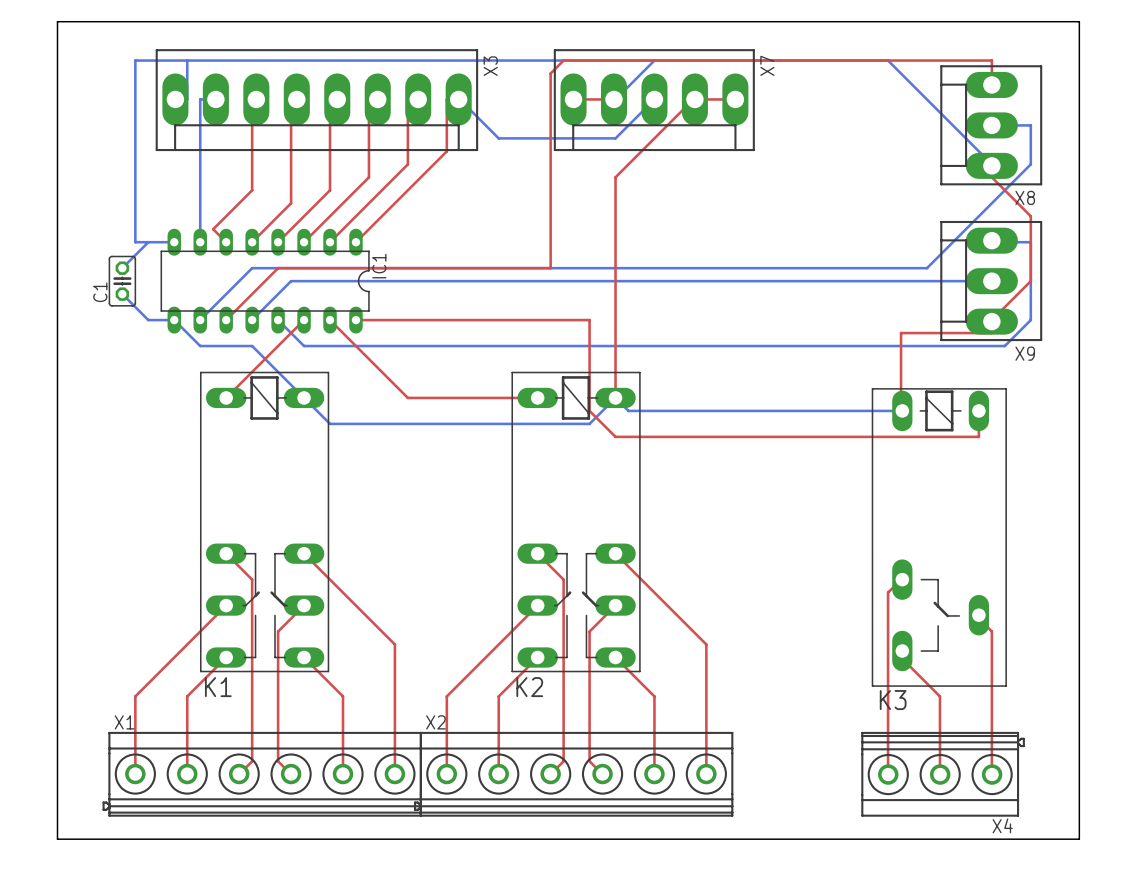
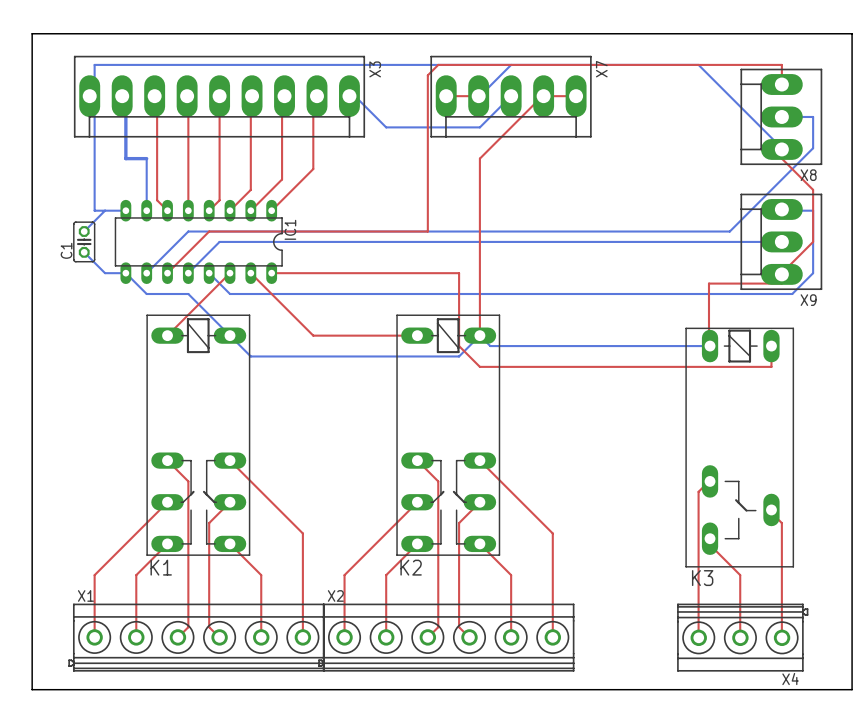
X3 footprint: [155, 49, 479, 152] -> [73, 55, 366, 138]
bottom track: (187, 60) (187, 99) (175, 99) -> none
top track: none -> (154, 96) (157, 96) (157, 200)
bottom track: (215, 99) (200, 99) (200, 177) -> (122, 96) (125, 96) (125, 158) (146, 158)
top track: (458, 99) (446, 99) (446, 151) (407, 190) -> none
top track: (407, 164) (368, 203) -> (313, 148) (313, 169)
top track: (368, 177) (330, 216) -> (282, 158) (282, 179)
top track: (252, 190) (213, 229) -> (188, 169) (188, 210)
top track: (330, 190) (291, 229) -> (250, 169) (250, 189)
top track: (291, 203) (252, 242) -> (219, 179) (219, 200)

